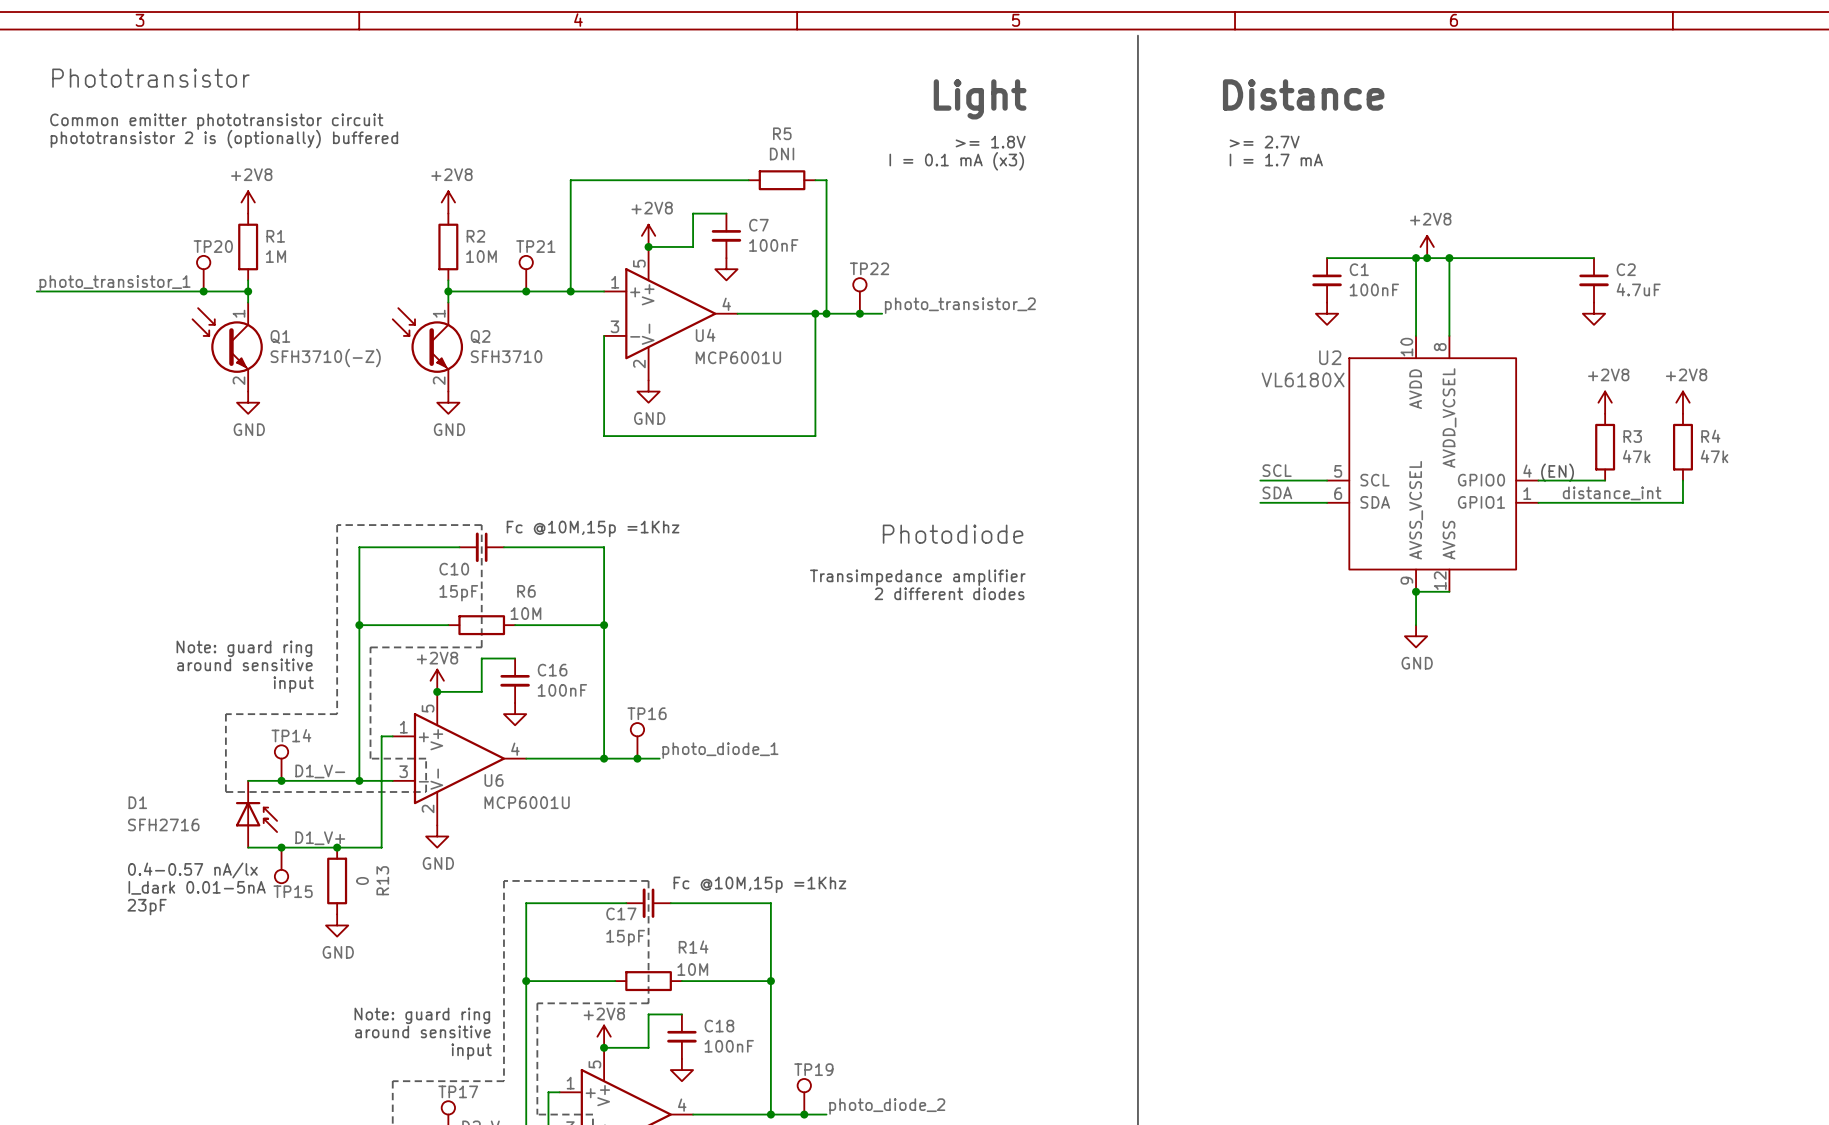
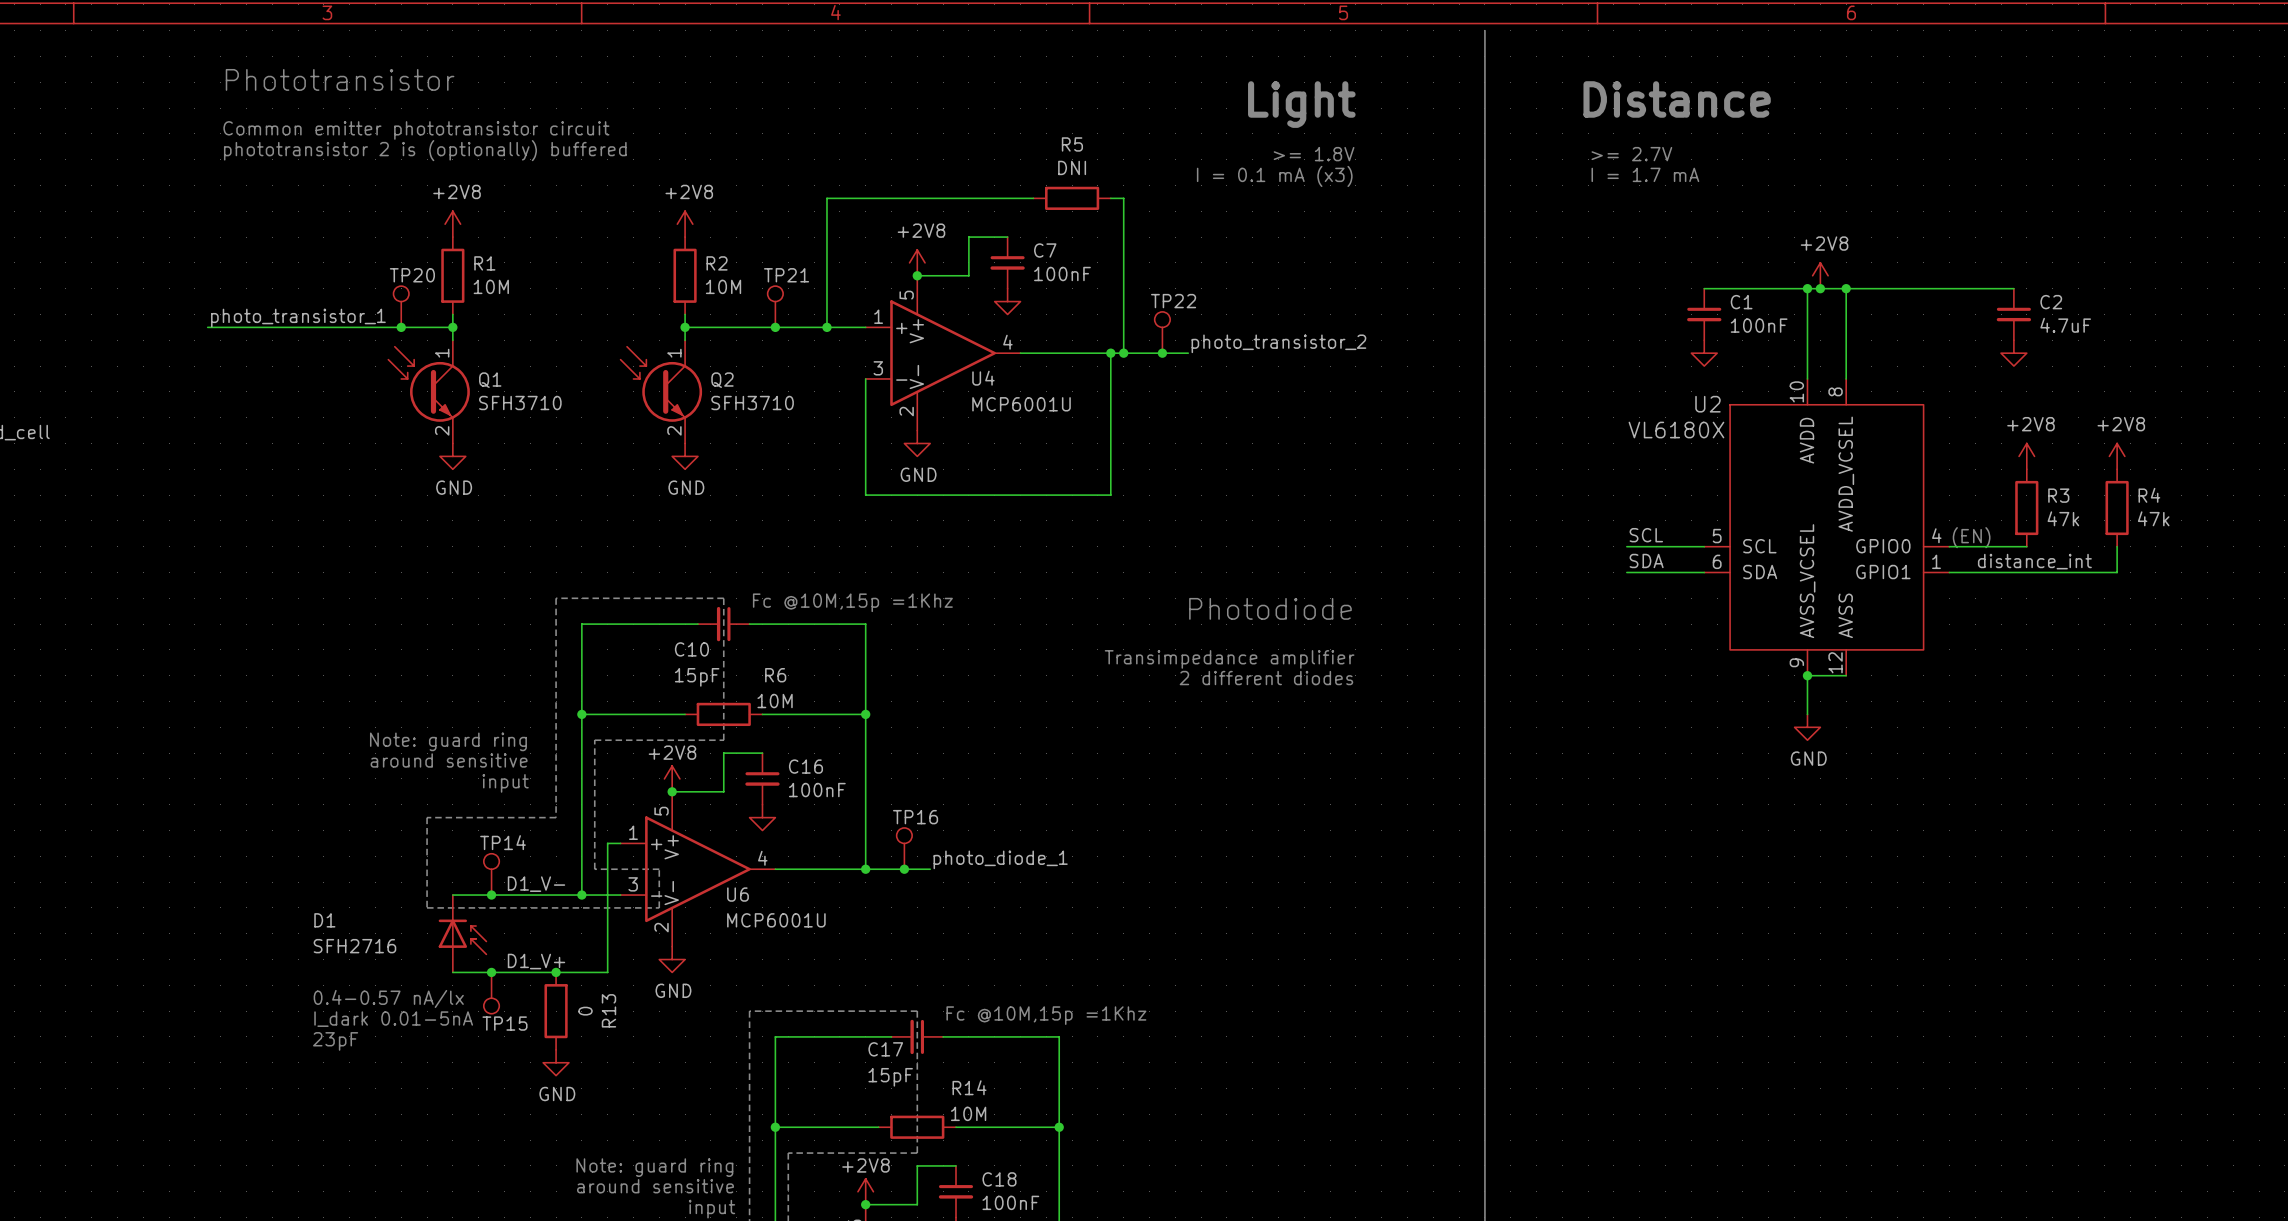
R1 value: 1M (275, 256) -> 10M (491, 286)
Q1 value: SFH3710(-Z) (325, 358) -> SFH3710 (520, 403)

